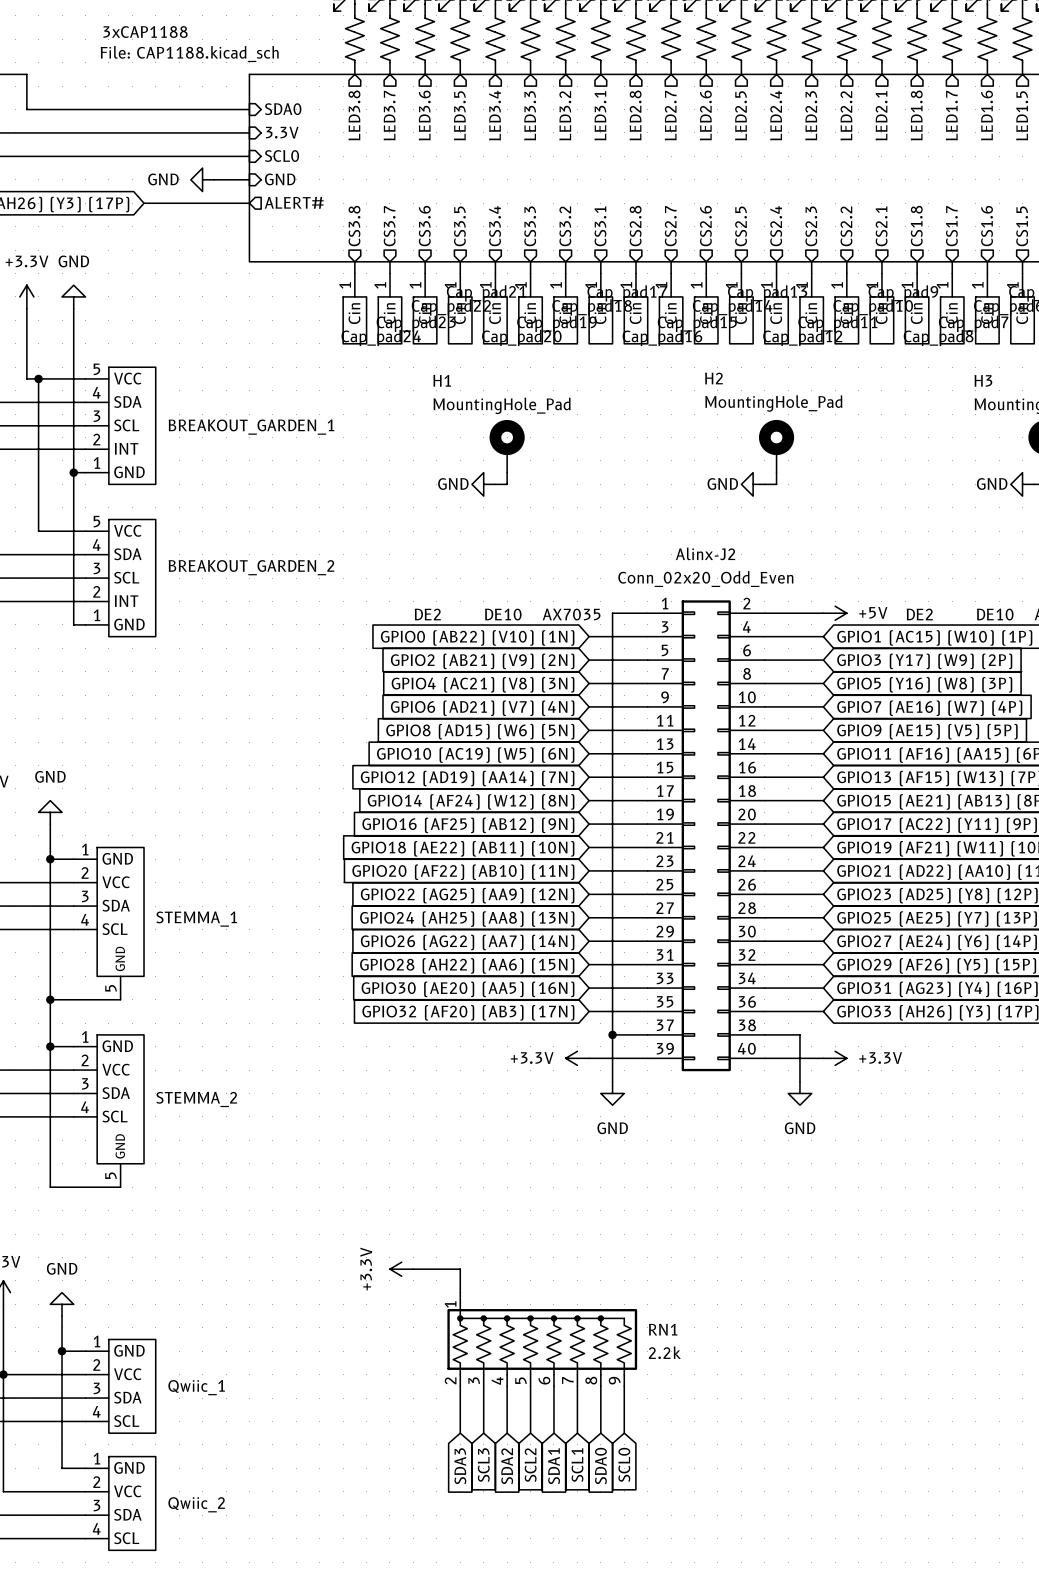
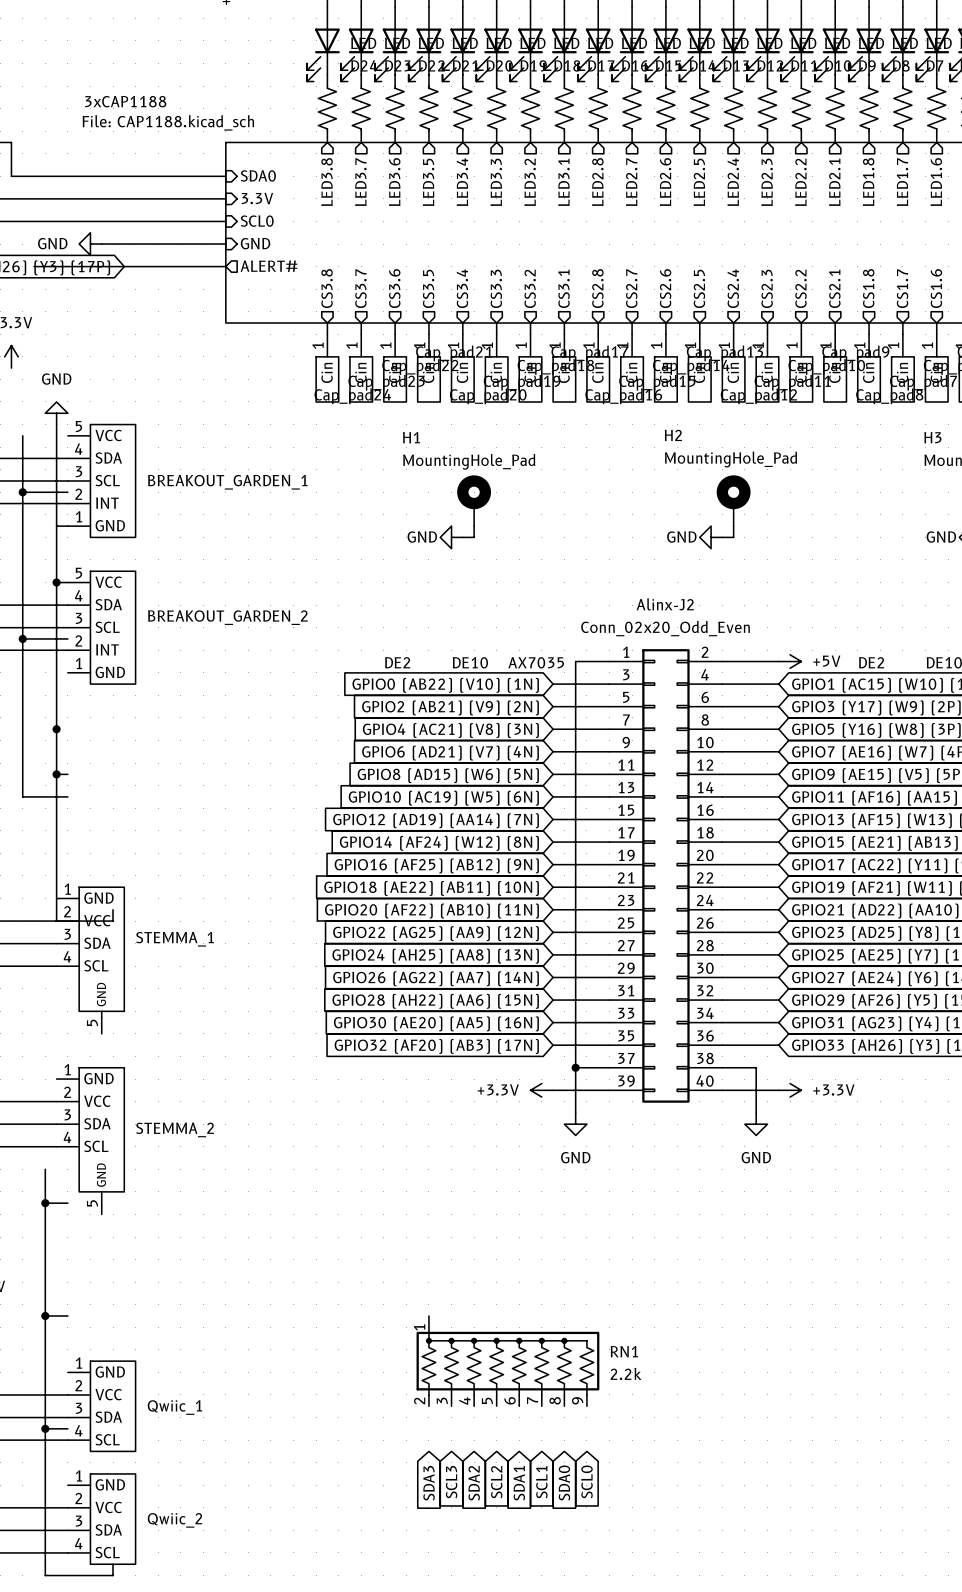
power symbol: none -> GND (90, 244)
wire: none -> (101, 244) (192, 244)
power symbol: GND (202, 179) -> none
wire: none -> (34, 266) (124, 266)
power symbol position: GND (73, 296) -> GND (56, 413)
wire: (26, 308) (26, 378) (85, 378) -> none
wire: (73, 308) (73, 367) -> none
junction: (38, 378) -> none
wire: none -> (22, 492) (67, 492)
junction: none -> (22, 492)
junction: (73, 472) -> none
wire: (38, 531) (73, 531) -> (22, 582) (22, 796) (67, 796)
junction: none -> (56, 582)
wire: none -> (22, 638) (67, 638)
junction: none -> (22, 638)
wire: (73, 624) (85, 624) -> (56, 672) (56, 921) (113, 921) (113, 909)
junction: none -> (56, 729)
wire: none -> (56, 774) (67, 774)
junction: none -> (56, 774)
power symbol: GND (50, 812) -> none
wire: (50, 824) (50, 1187) (120, 1187) -> none
wire: (50, 859) (73, 859) -> none
junction: (50, 859) -> none
STEMMA_1 name position: STEMMA_1 (196, 919) -> STEMMA_1 (175, 939)
wire: (50, 999) (120, 999) -> none
junction: (50, 999) -> none
wire: (50, 1046) (73, 1046) -> (45, 1203) (67, 1203)
junction: (50, 1046) -> none
wire: none -> (45, 1169) (45, 1338)
junction: none -> (45, 1203)
power symbol: +3.3V (401, 1269) -> none
wire: (413, 1269) (460, 1269) (460, 1292) -> none
junction: none -> (45, 1316)
power symbol: GND (62, 1304) -> none
wire: (62, 1351) (85, 1351) -> (45, 1316) (67, 1316)
junction: (62, 1351) -> none
wire: (460, 1386) (460, 1433) -> none
wire: (483, 1386) (483, 1433) -> none
wire: (507, 1386) (507, 1433) -> none
wire: (530, 1386) (530, 1433) -> none
wire: (553, 1386) (553, 1433) -> none
wire: (577, 1386) (577, 1433) -> none
wire: (600, 1386) (600, 1433) -> none
wire: (624, 1386) (624, 1433) -> none
wire: none -> (45, 1428) (67, 1428)
junction: none -> (45, 1428)
wire: (62, 1468) (85, 1468) -> (45, 1485) (45, 1575) (113, 1575) (113, 1564)

